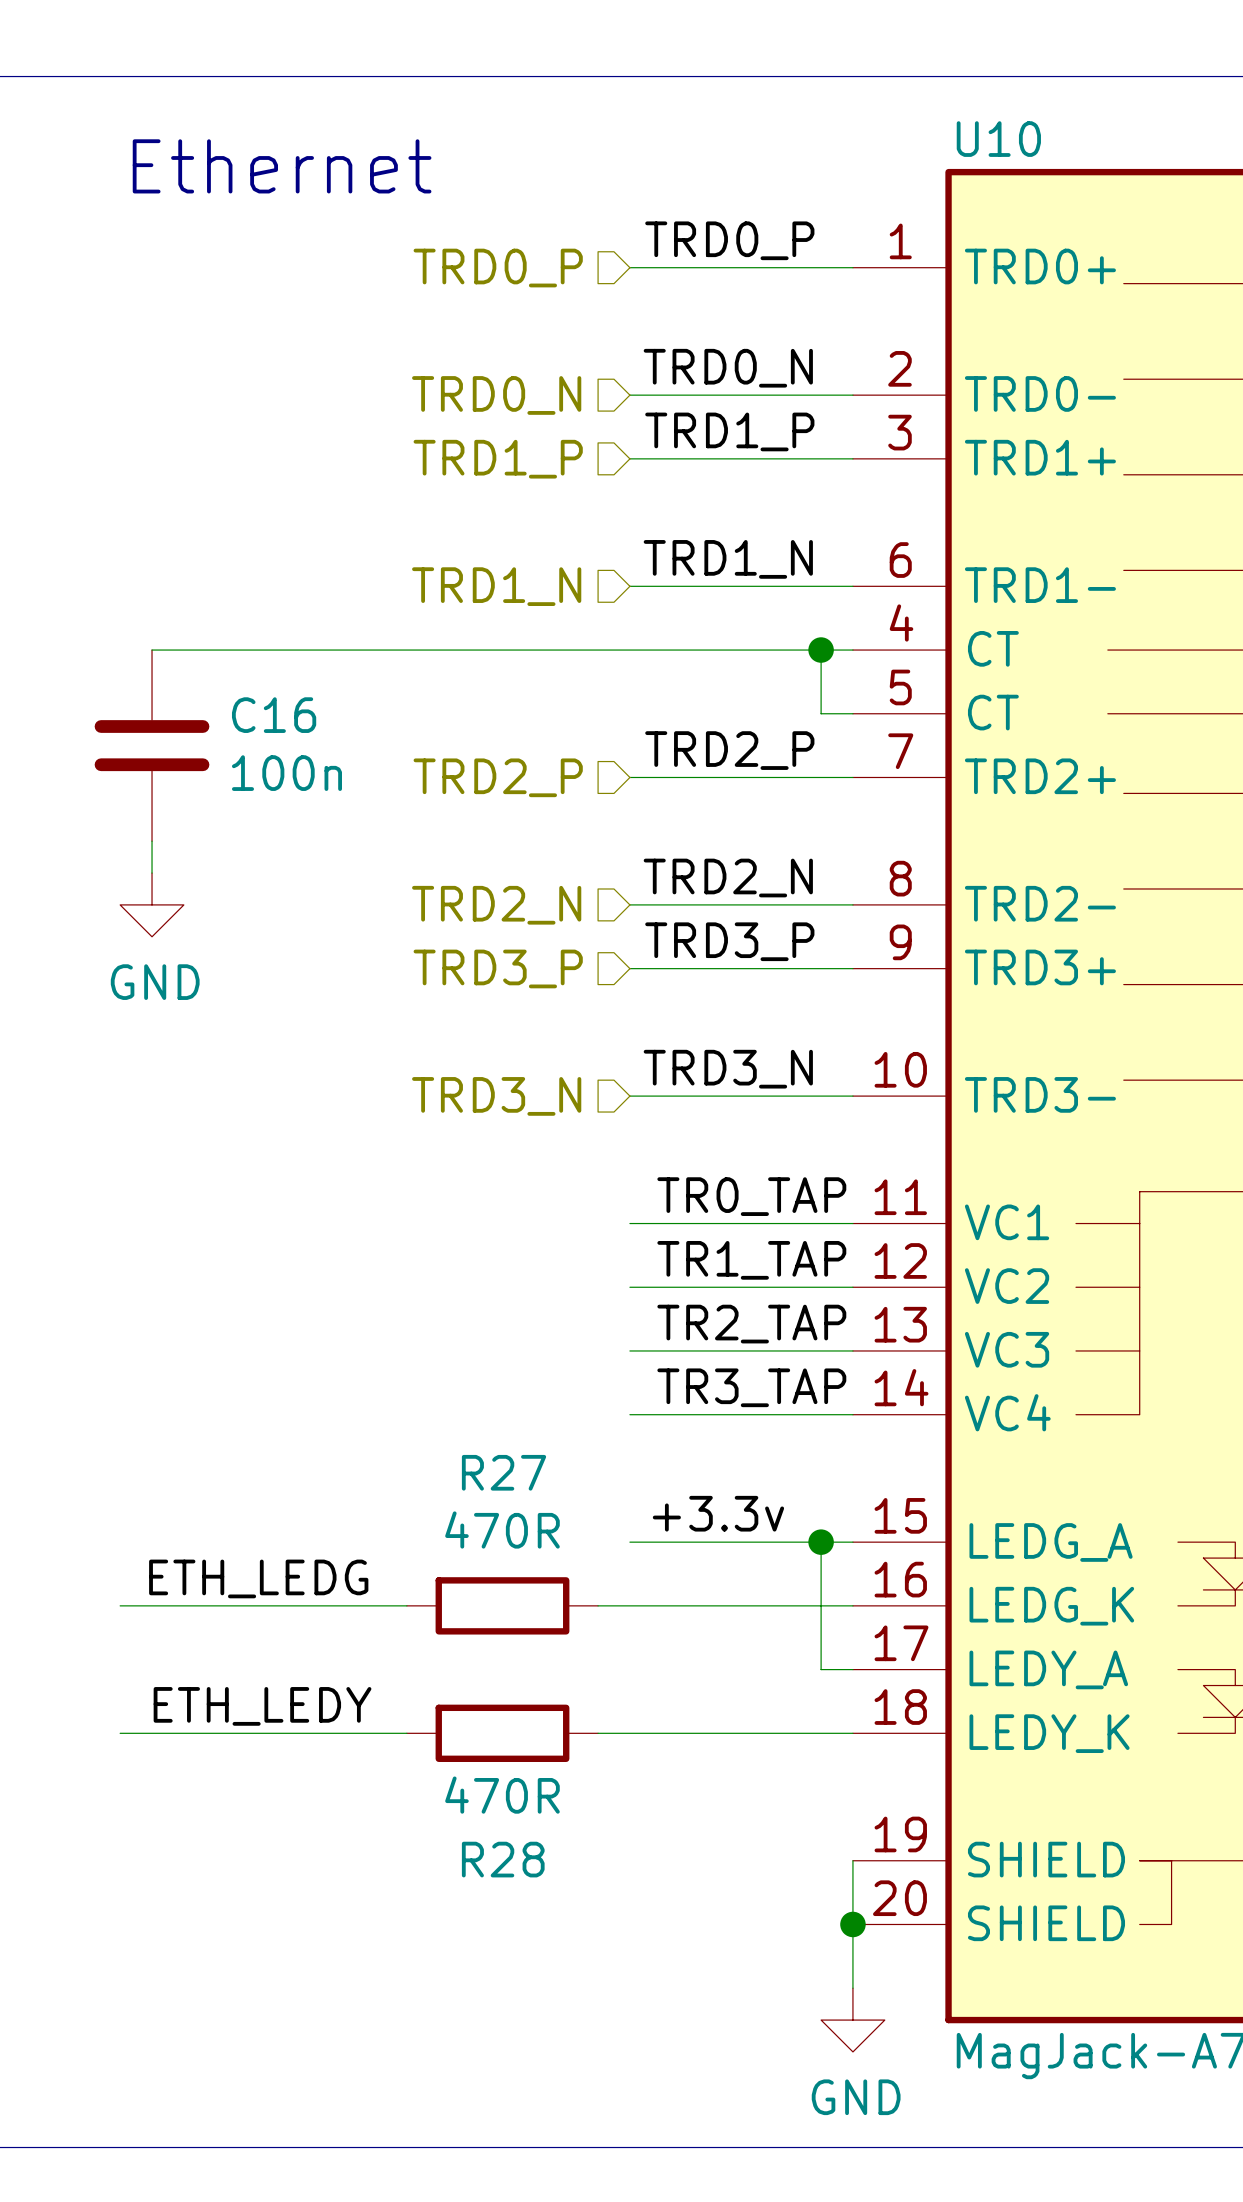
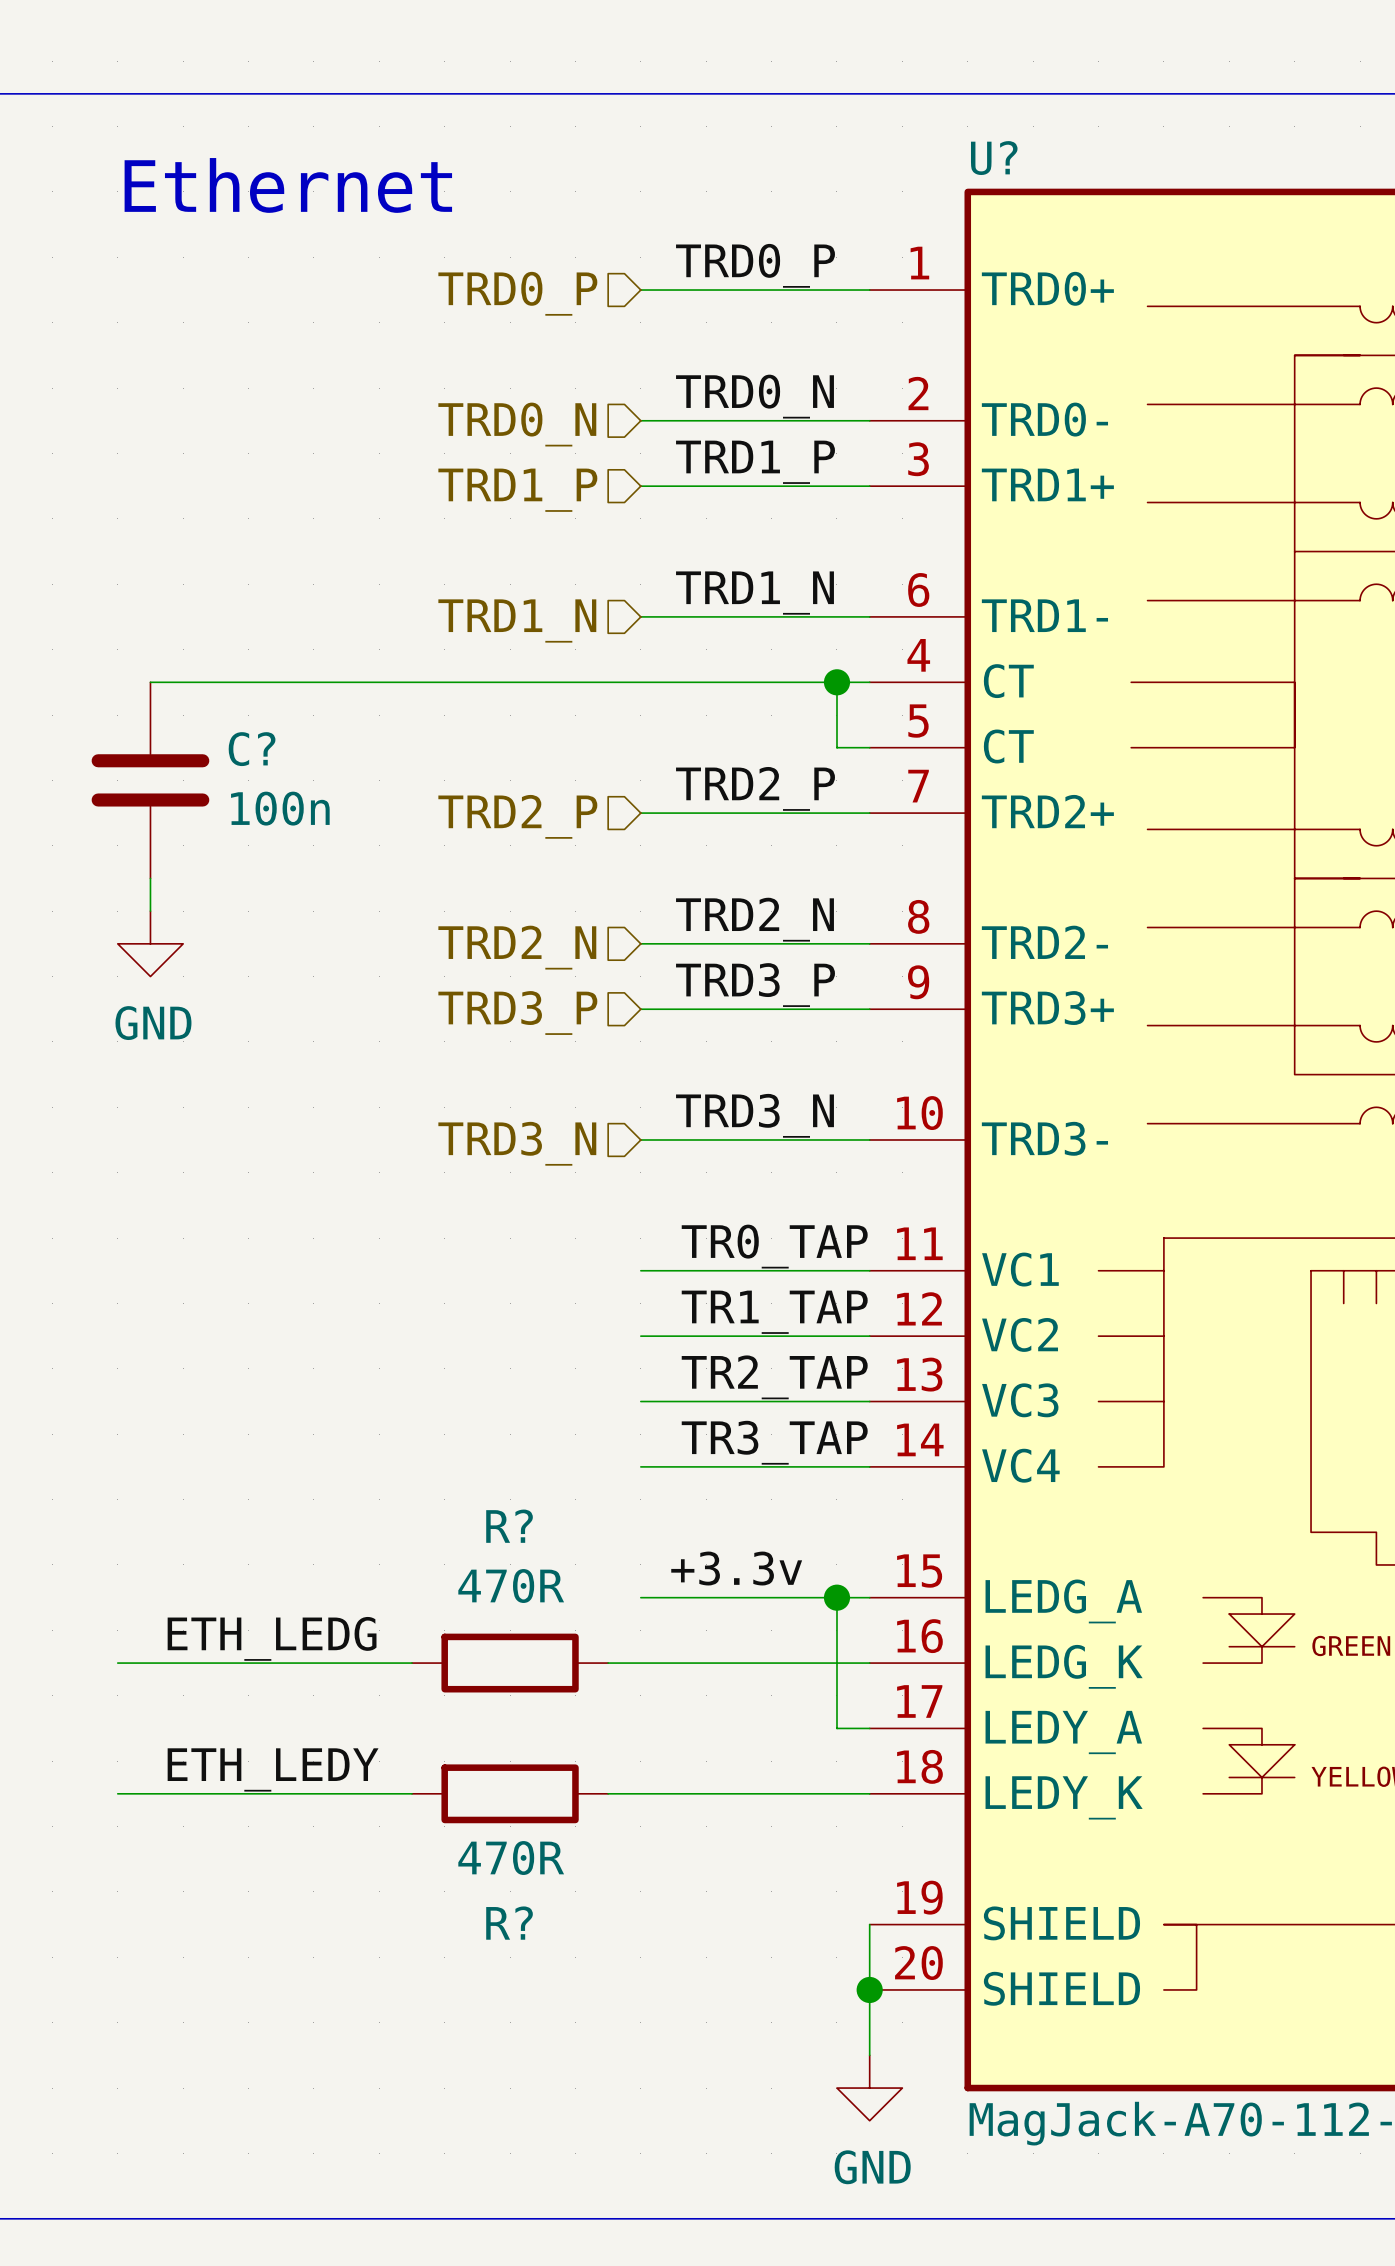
U10 name: U10 (998, 139) -> U? (994, 158)
C16 name: C16 (274, 715) -> C? (252, 749)
R27 name: R27 (504, 1472) -> R? (509, 1526)
R28 name: R28 (503, 1859) -> R? (509, 1923)

